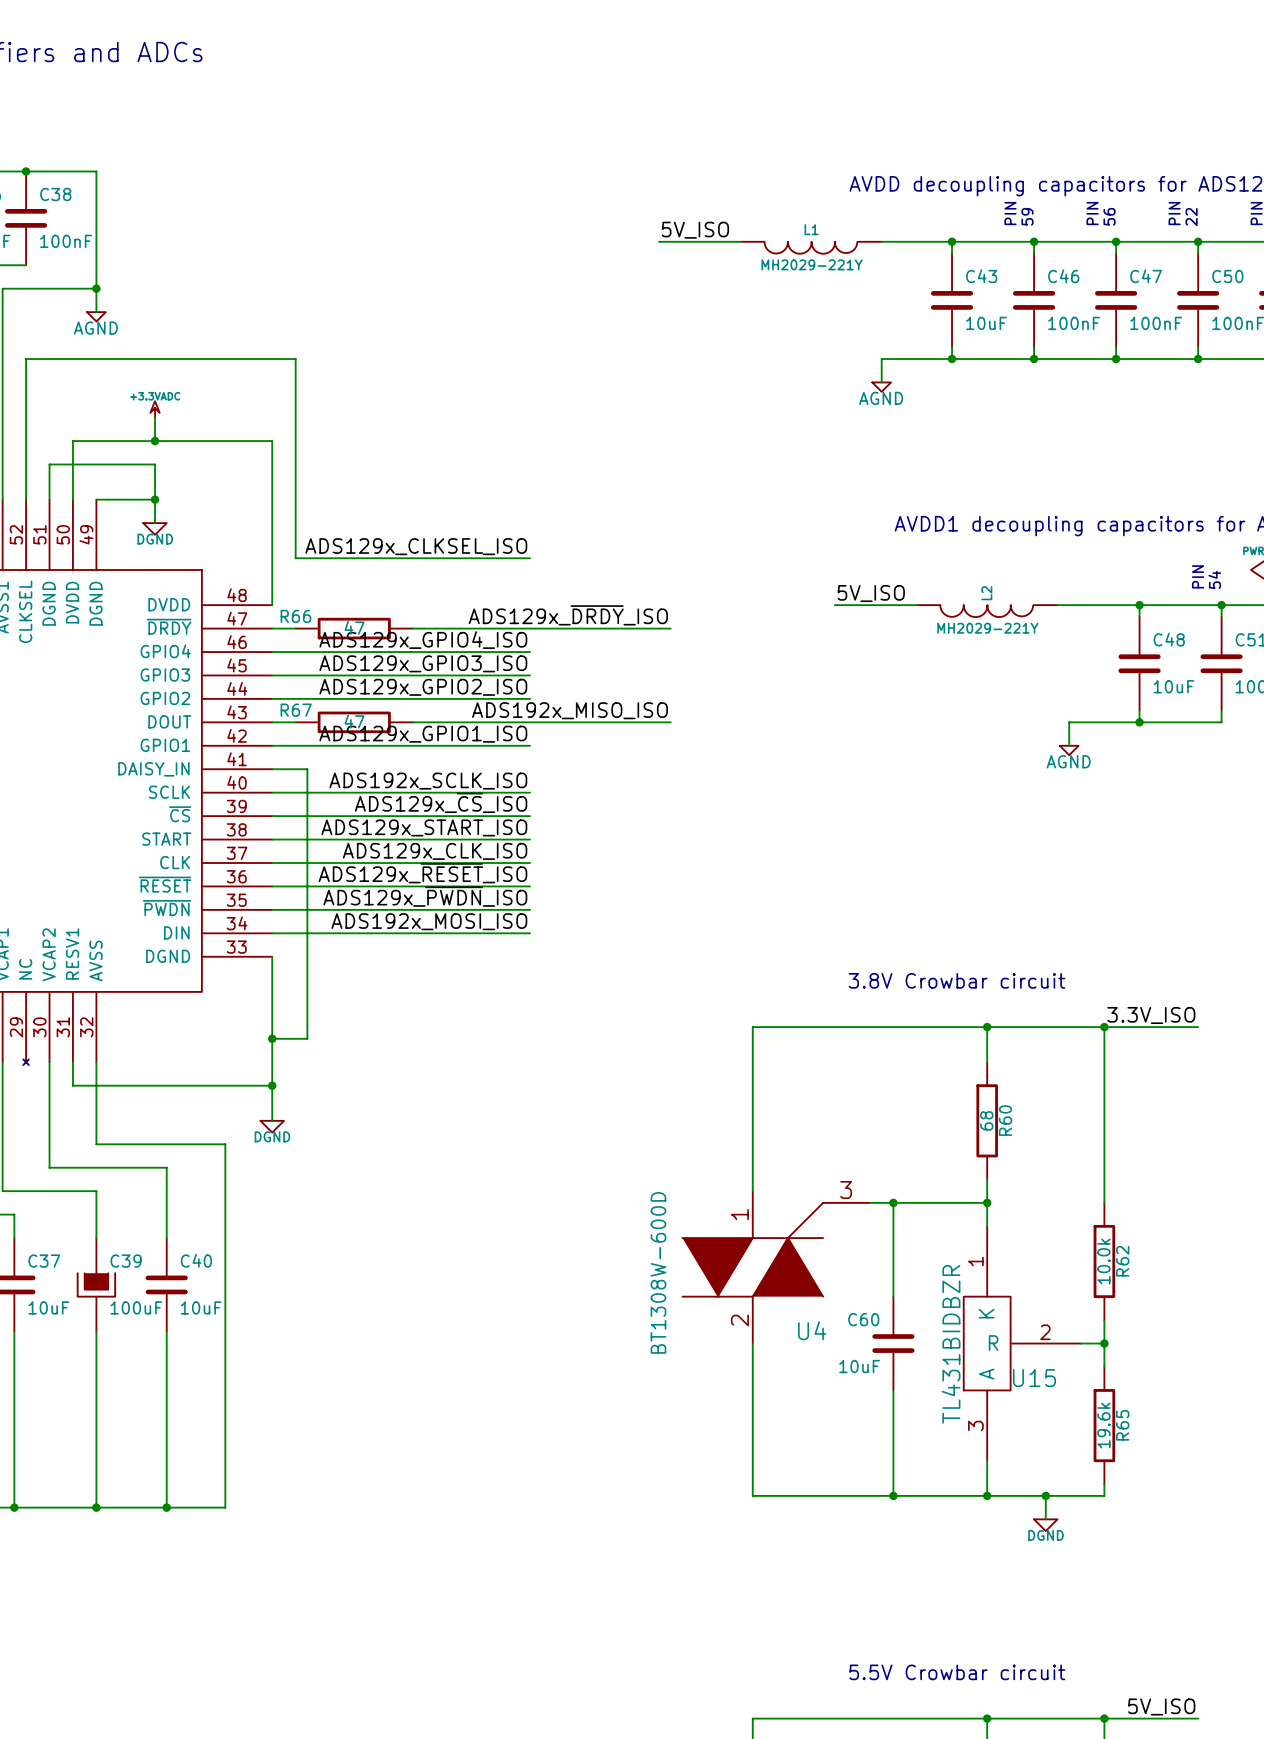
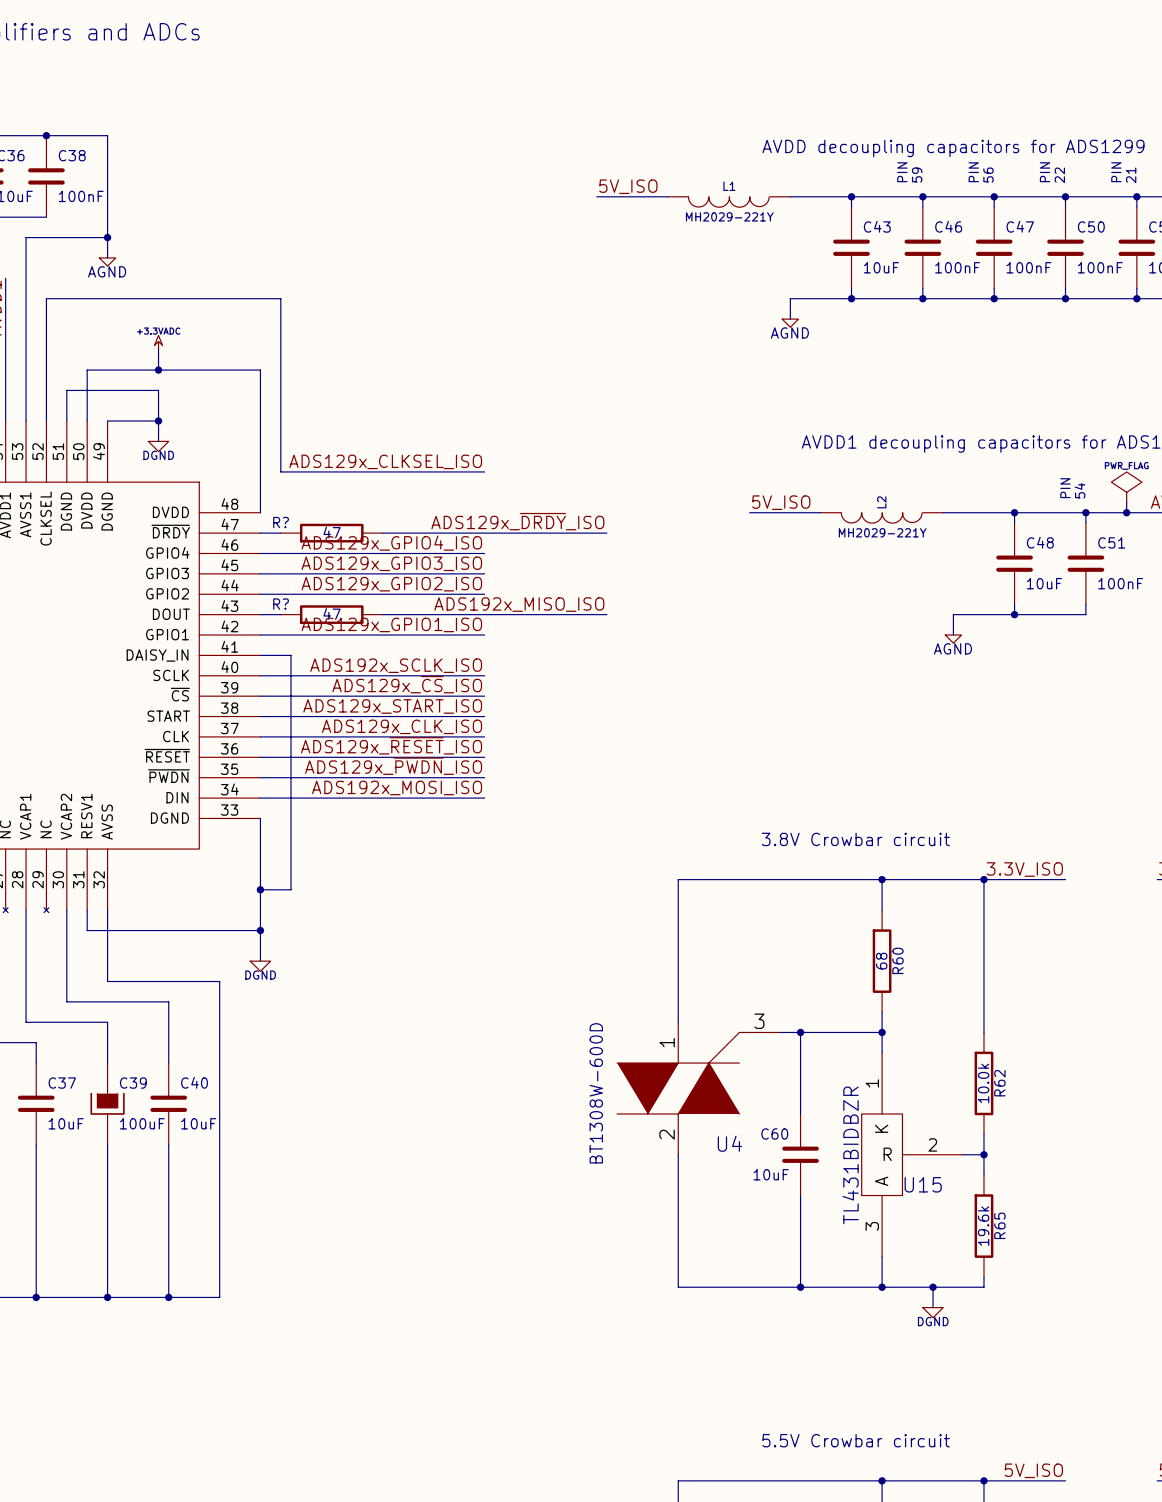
R66 name: R66 (295, 616) -> R? (281, 522)
R67 name: R67 (296, 710) -> R? (281, 604)

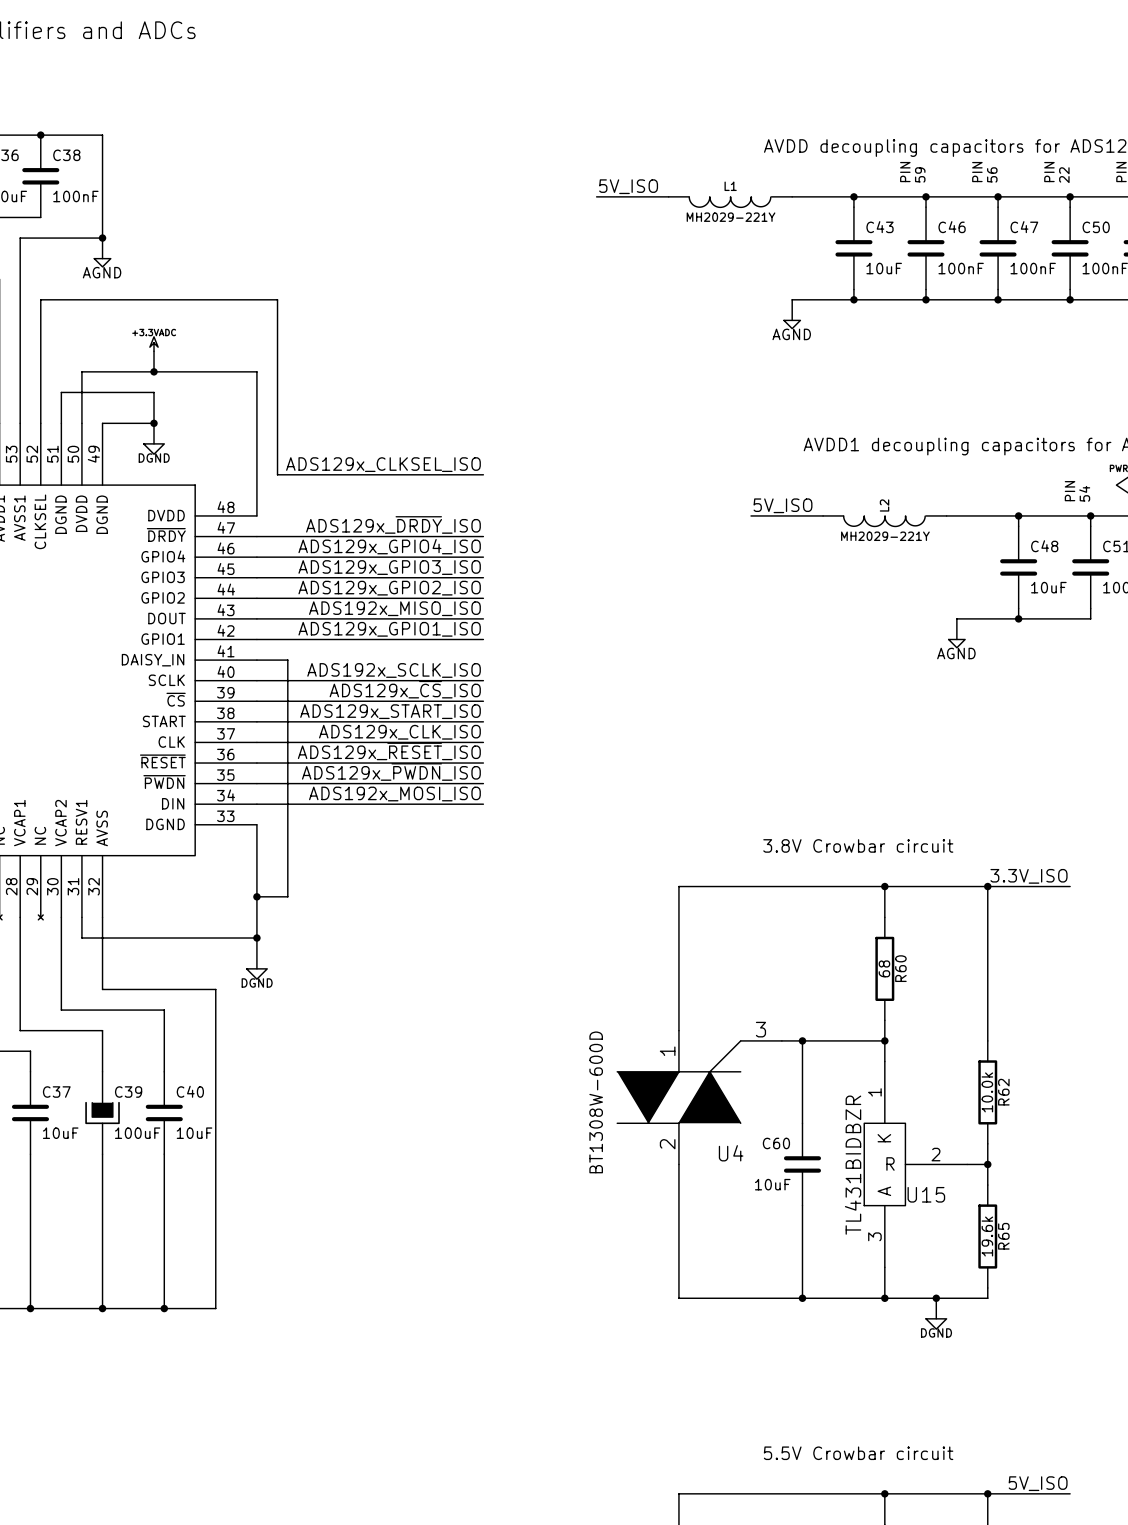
label position: ADS129x_~{DRDY}_ISO (517, 521) -> ADS129x_~{DRDY}_ISO (393, 524)
wire: none -> (277, 536) (380, 536)
R?: 47 (331, 533) -> none
wire: (484, 533) (606, 533) -> none
label position: ADS192x_MISO_ISO (519, 604) -> ADS192x_MISO_ISO (394, 608)
wire: none -> (277, 618) (380, 618)
R?: 47 (331, 614) -> none
wire: (484, 614) (606, 614) -> none

